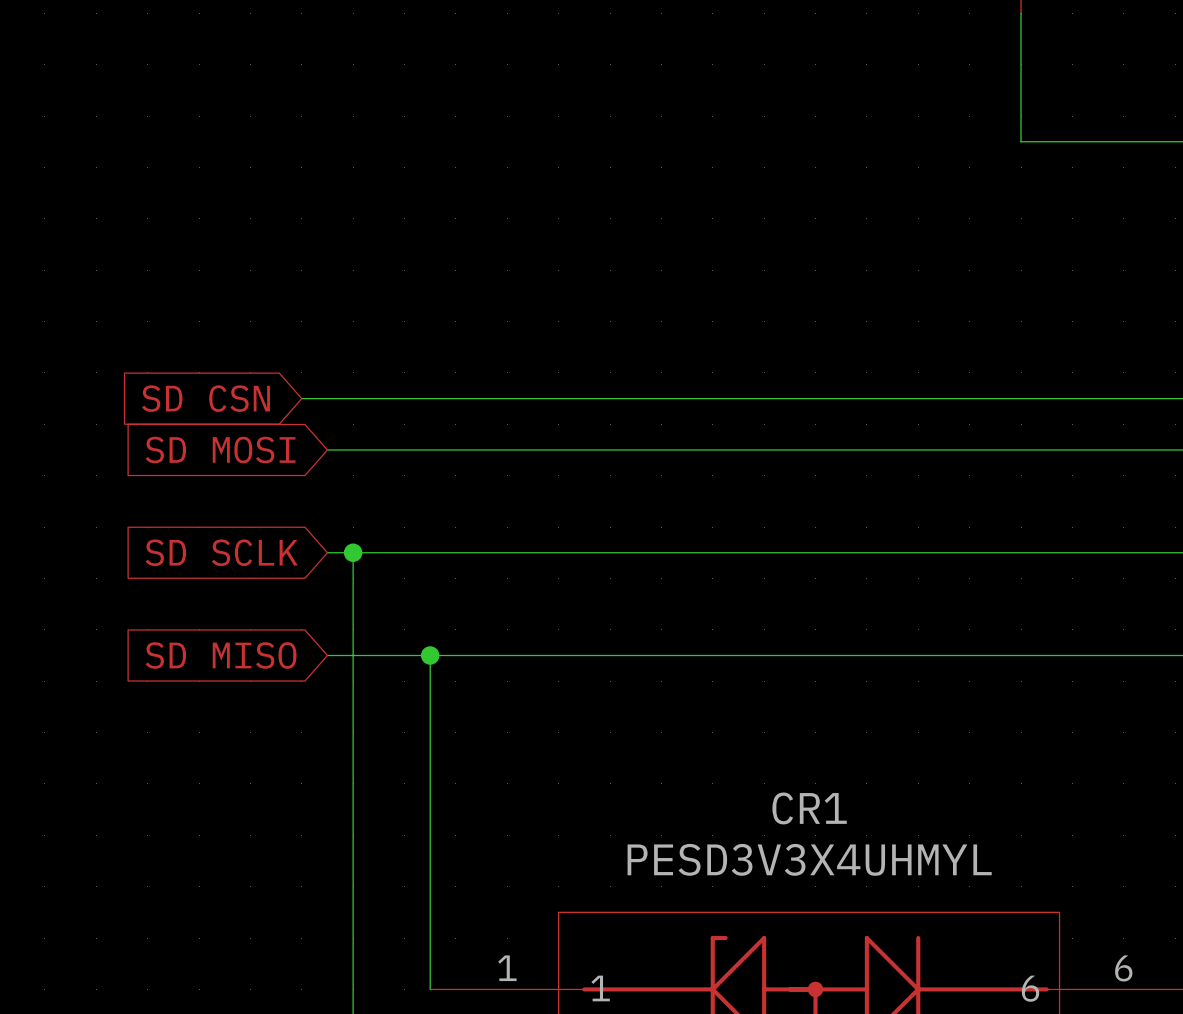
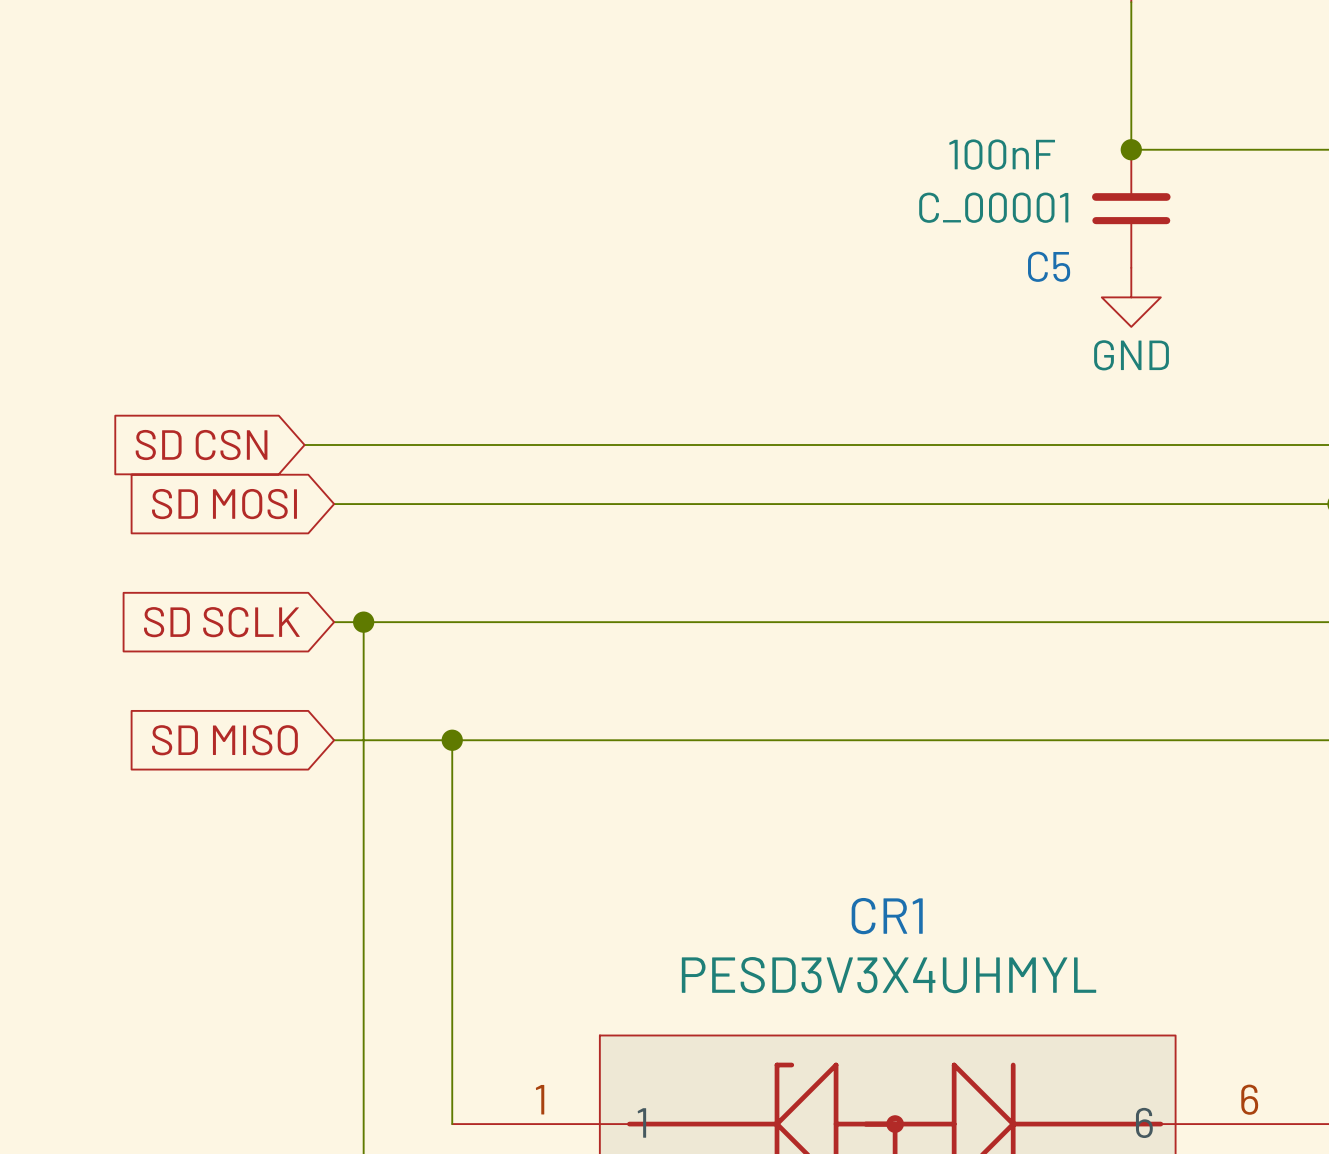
junction: none -> (1131, 149)
C5: none -> C_00001 (1131, 208)
power symbol: none -> GND (1131, 297)

